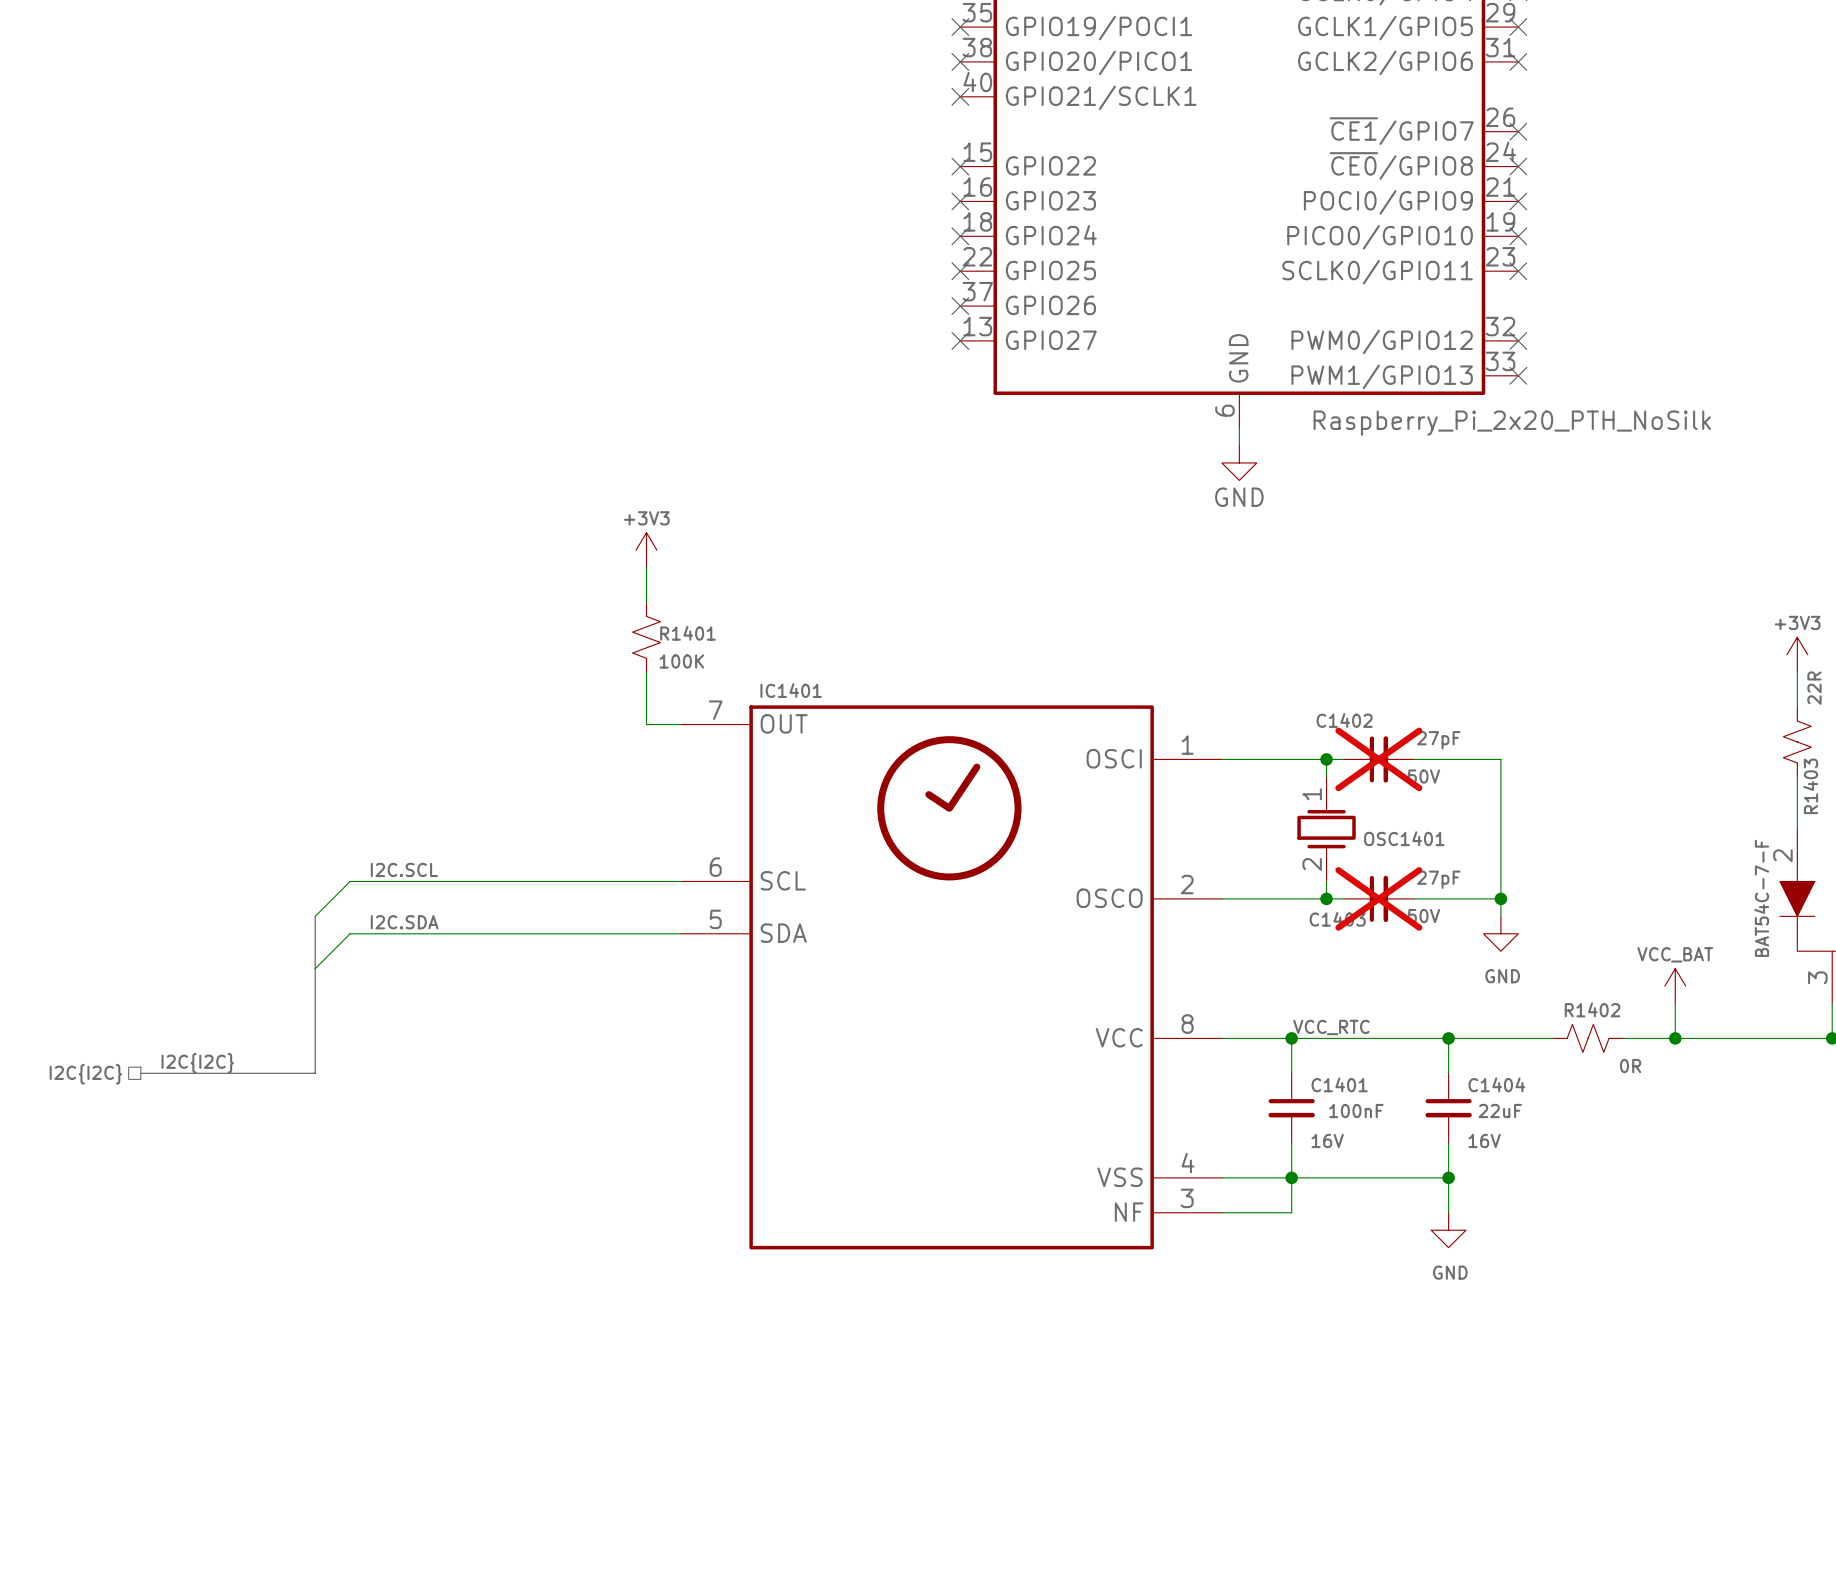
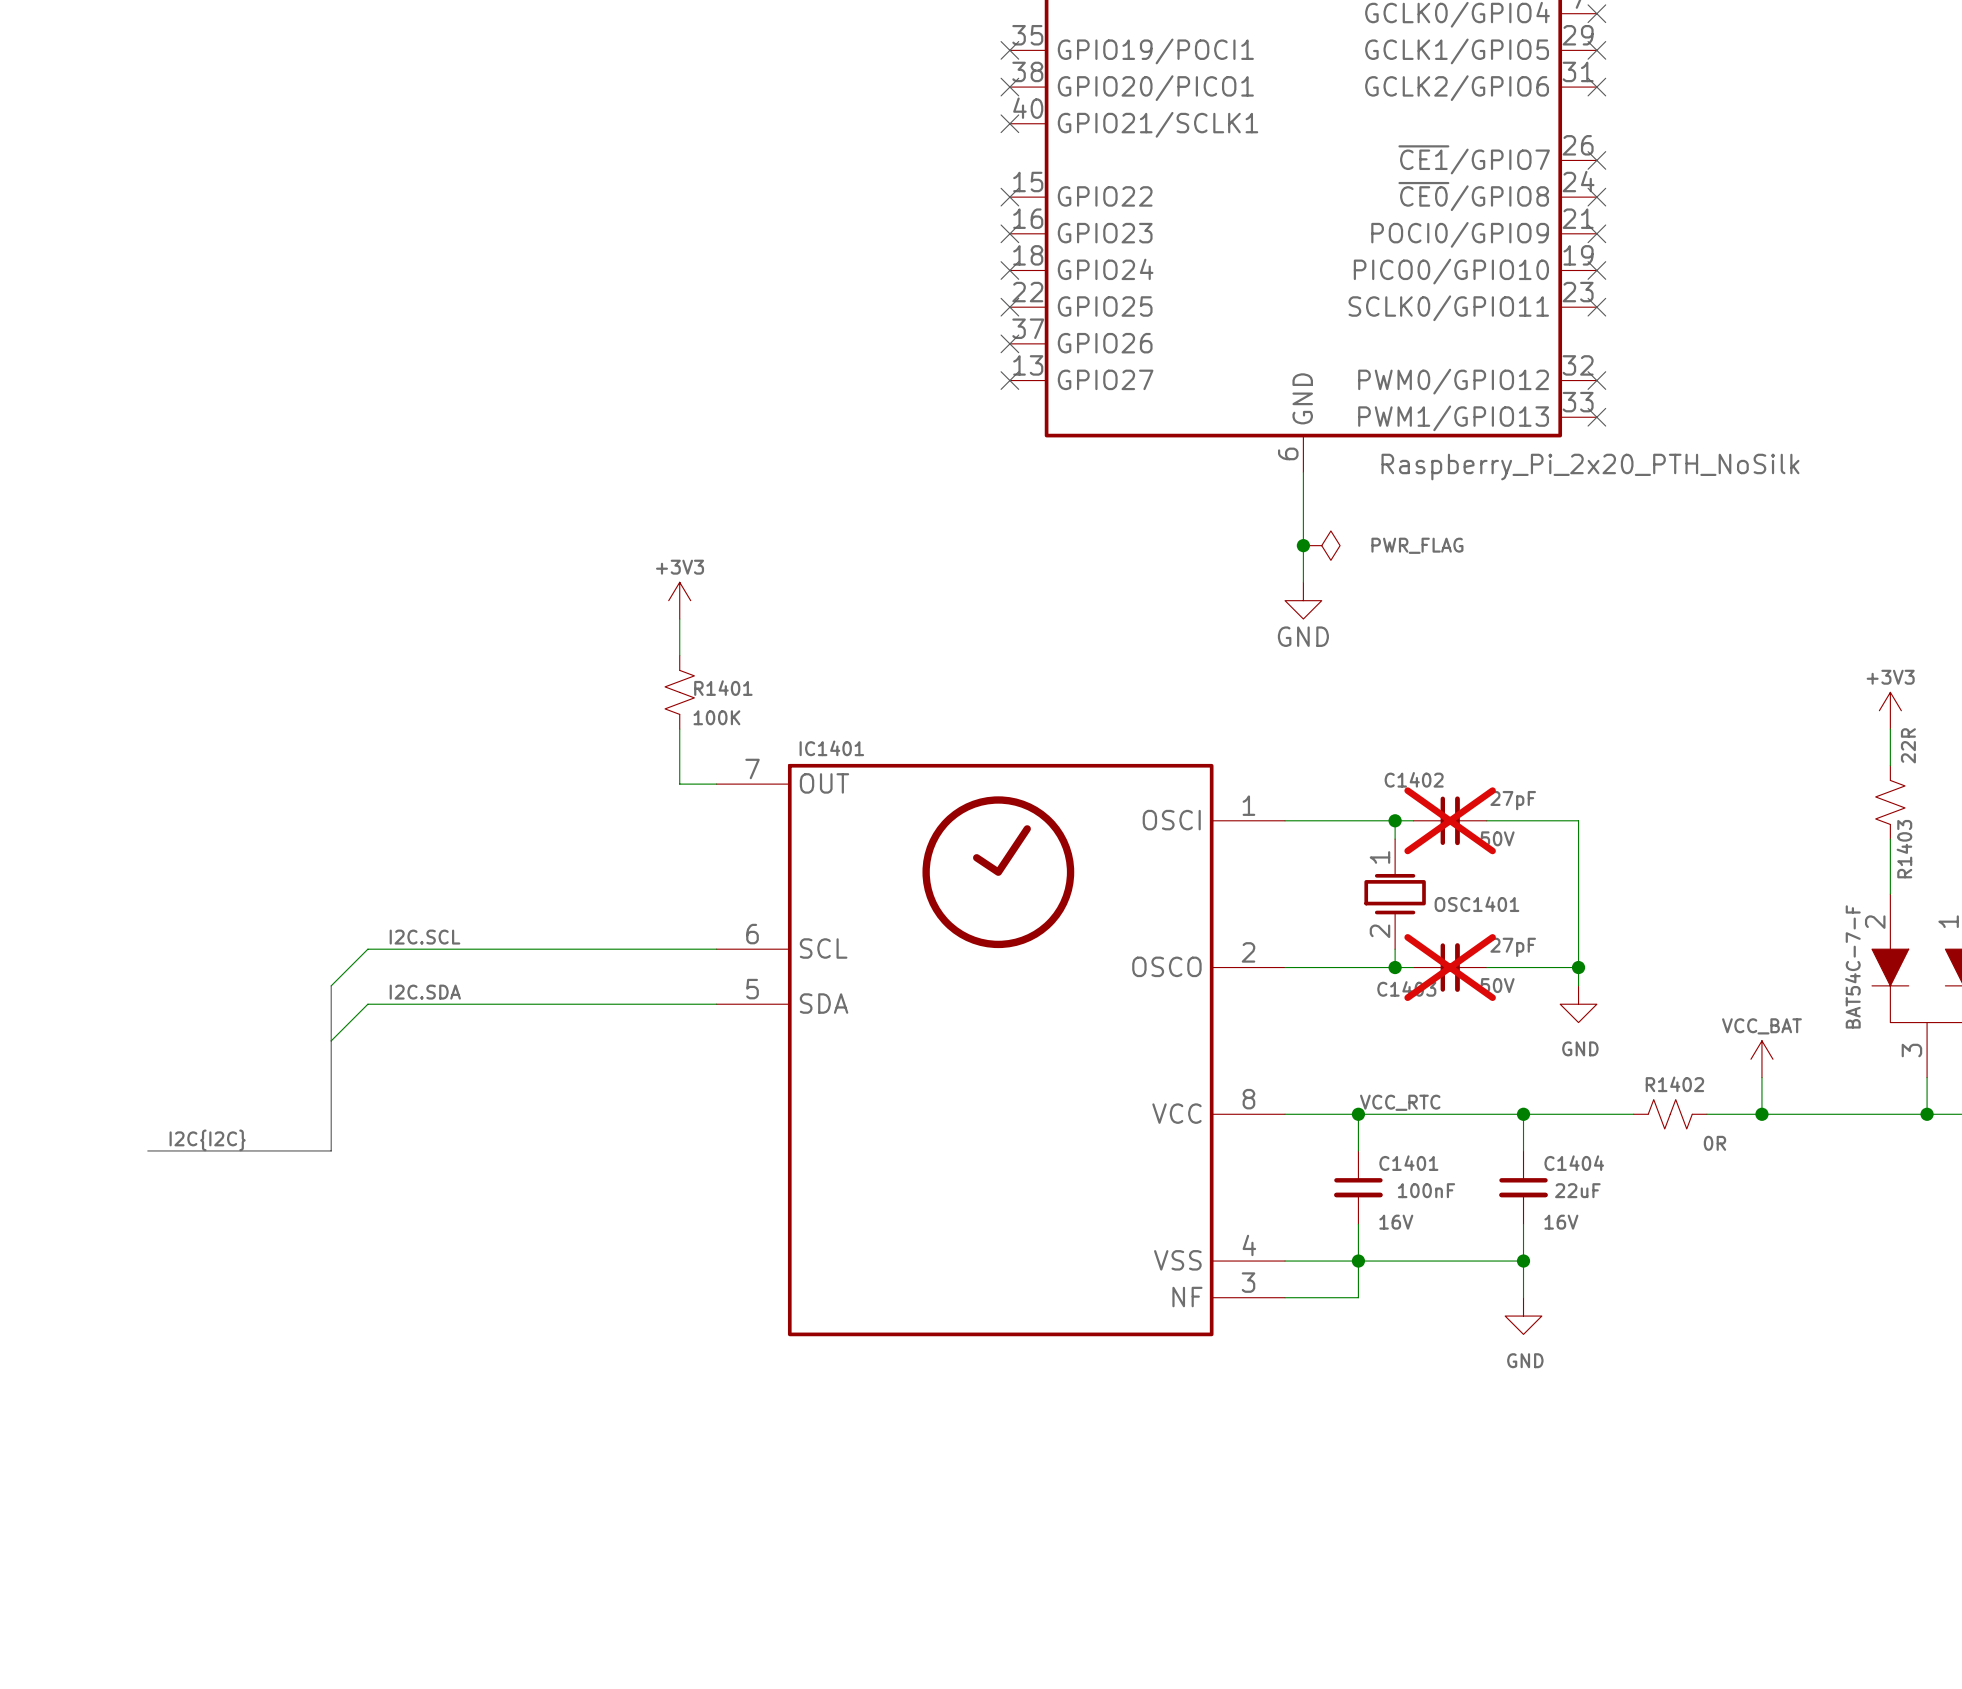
wire: none -> (1303, 490) (1303, 582)
power symbol position: GND (1239, 462) -> GND (1303, 600)
junction: none -> (1303, 545)
power symbol: none -> PWR_FLAG (1321, 545)
hierarchical label: I2C{I2C} (85, 1074) -> none

